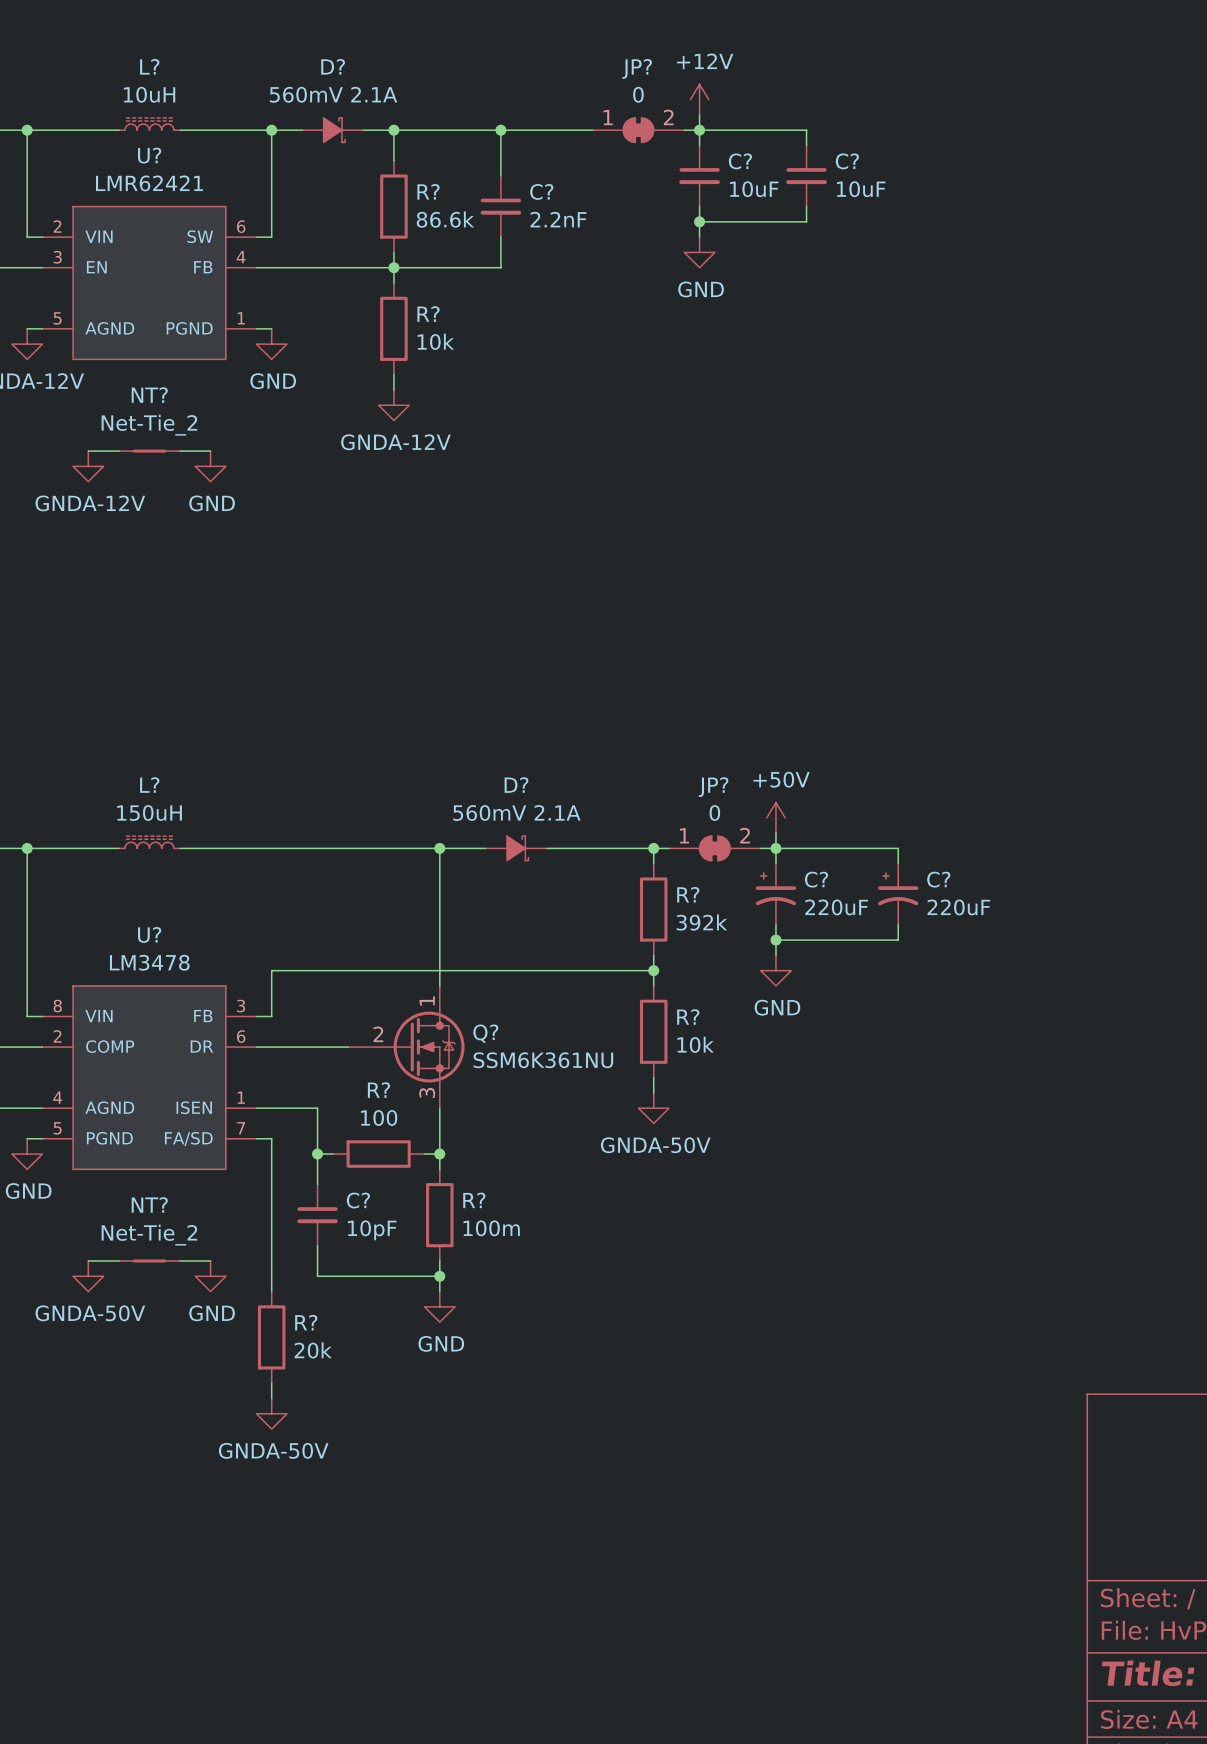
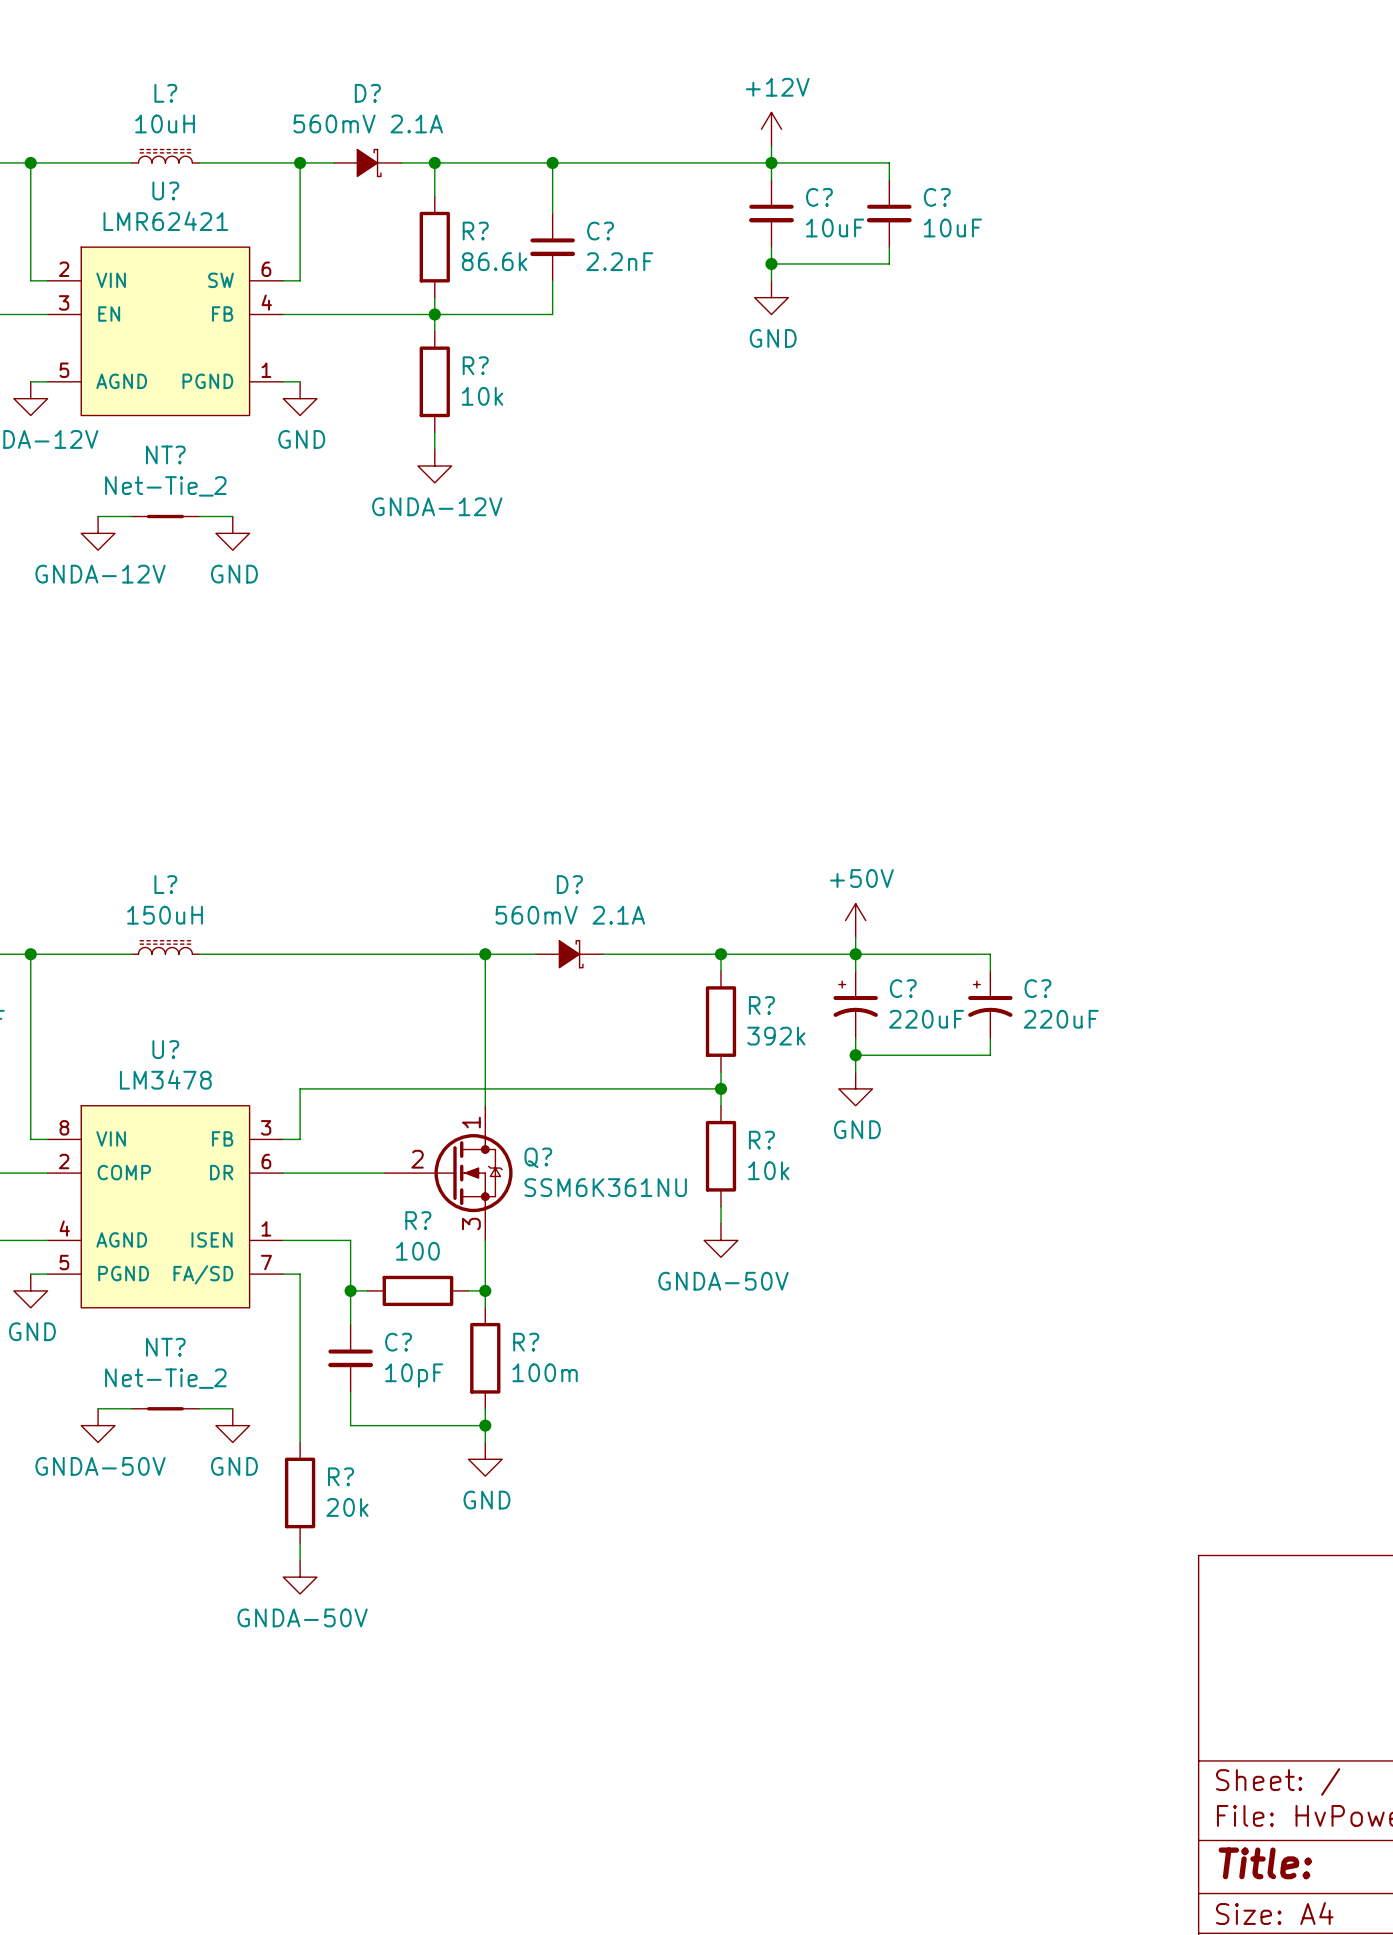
JP?: 0 (638, 130) -> none
JP?: 0 (714, 848) -> none

